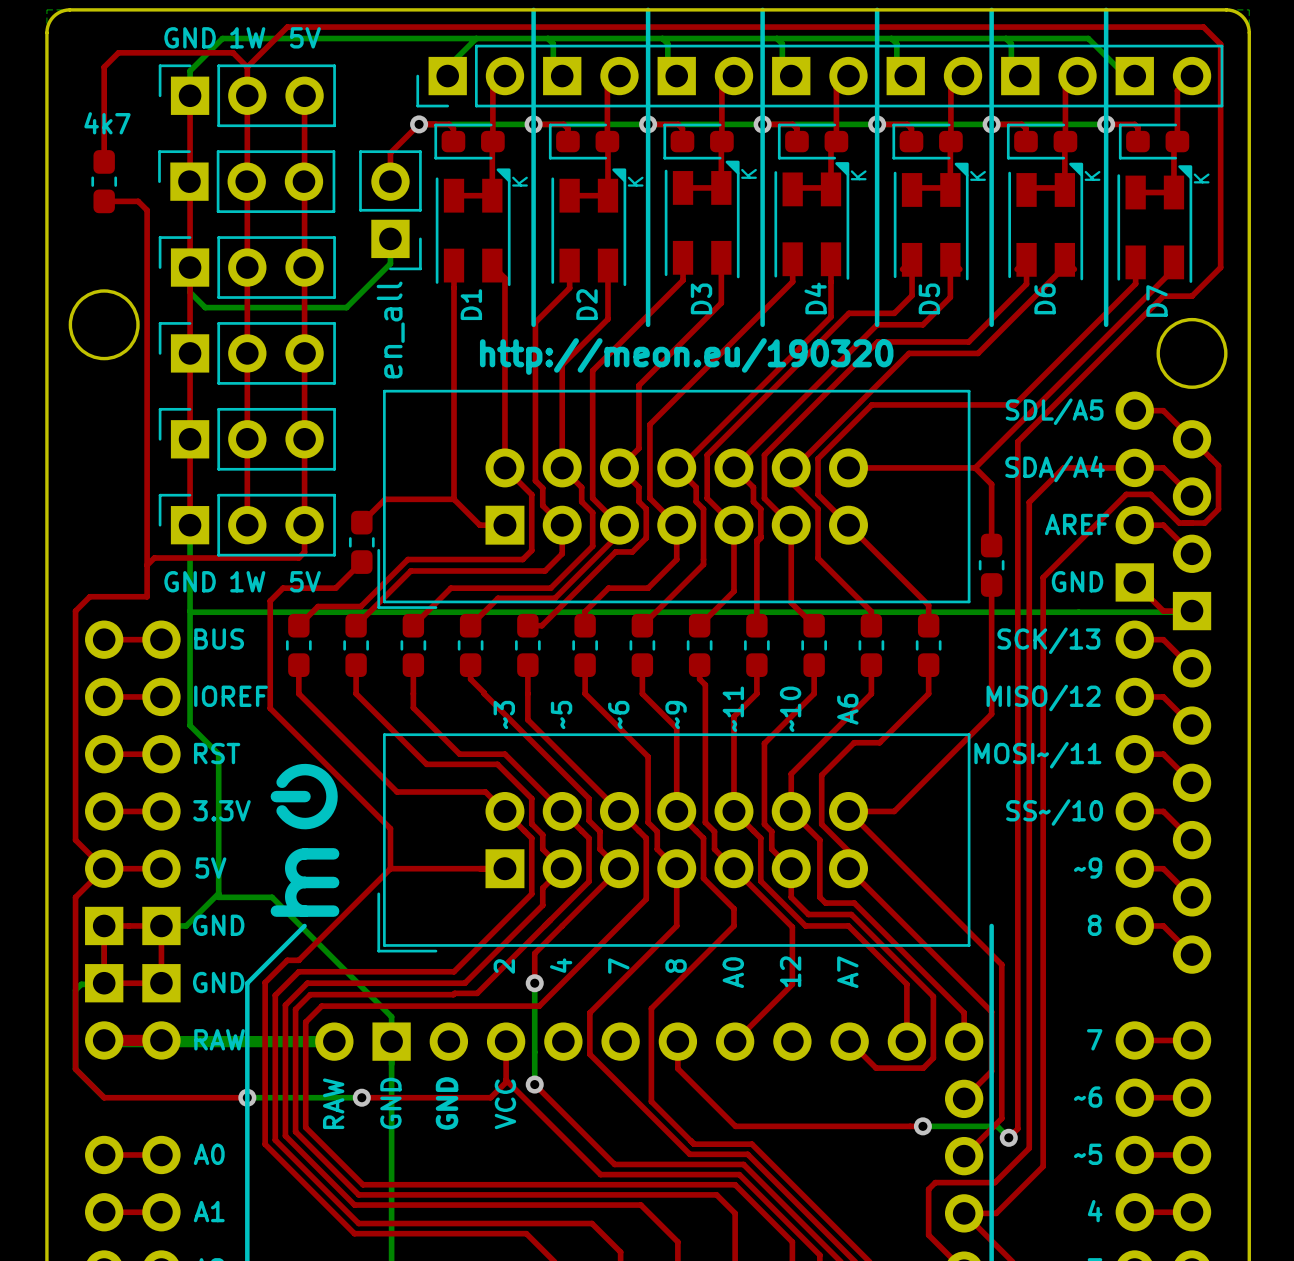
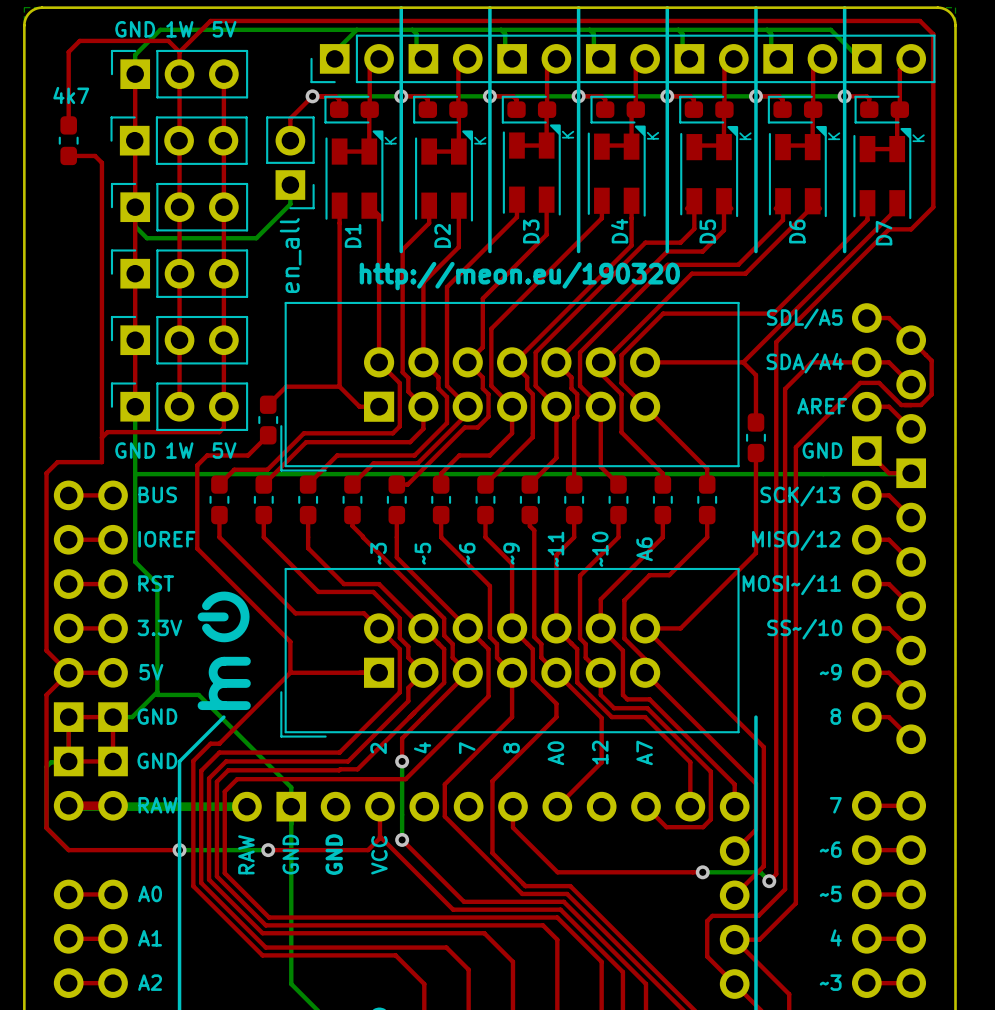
round board edge: [68, 289, 140, 361] -> none
round board edge: [1156, 317, 1228, 389] -> none

